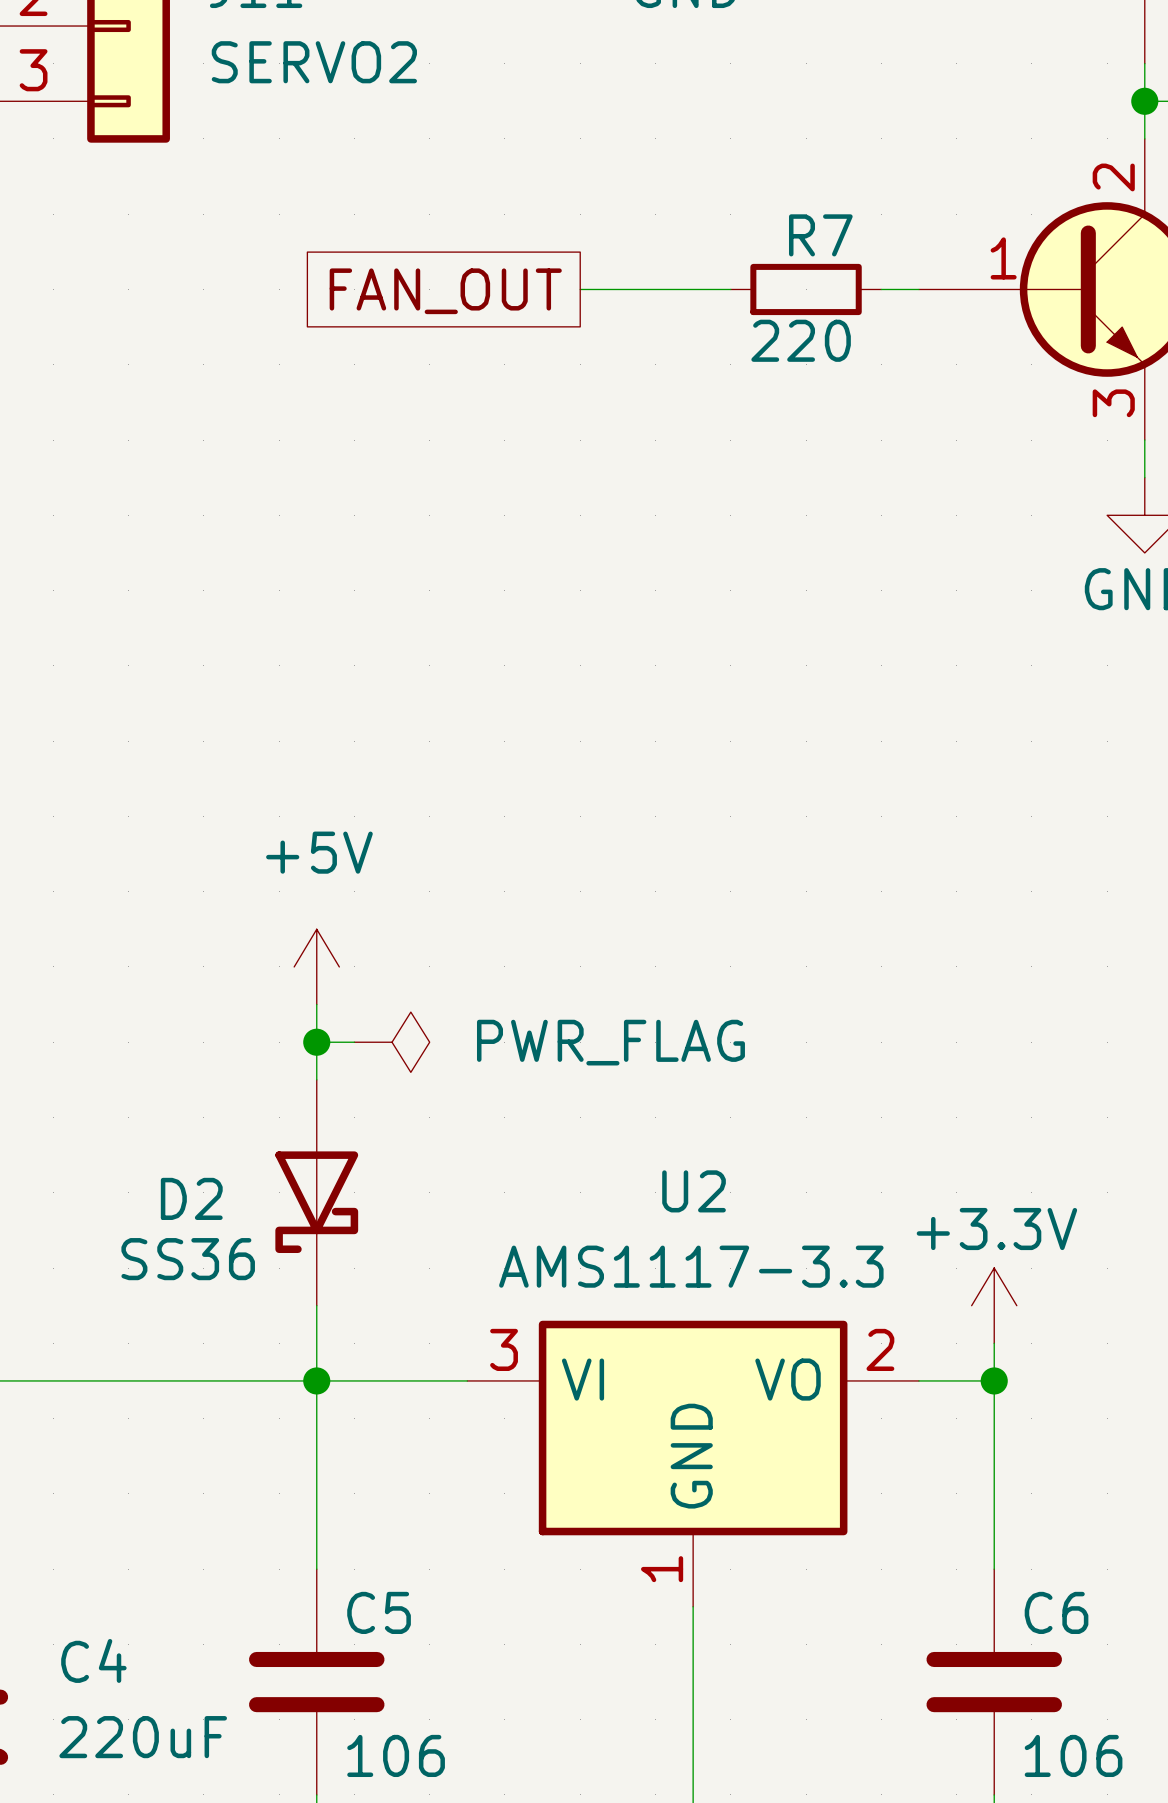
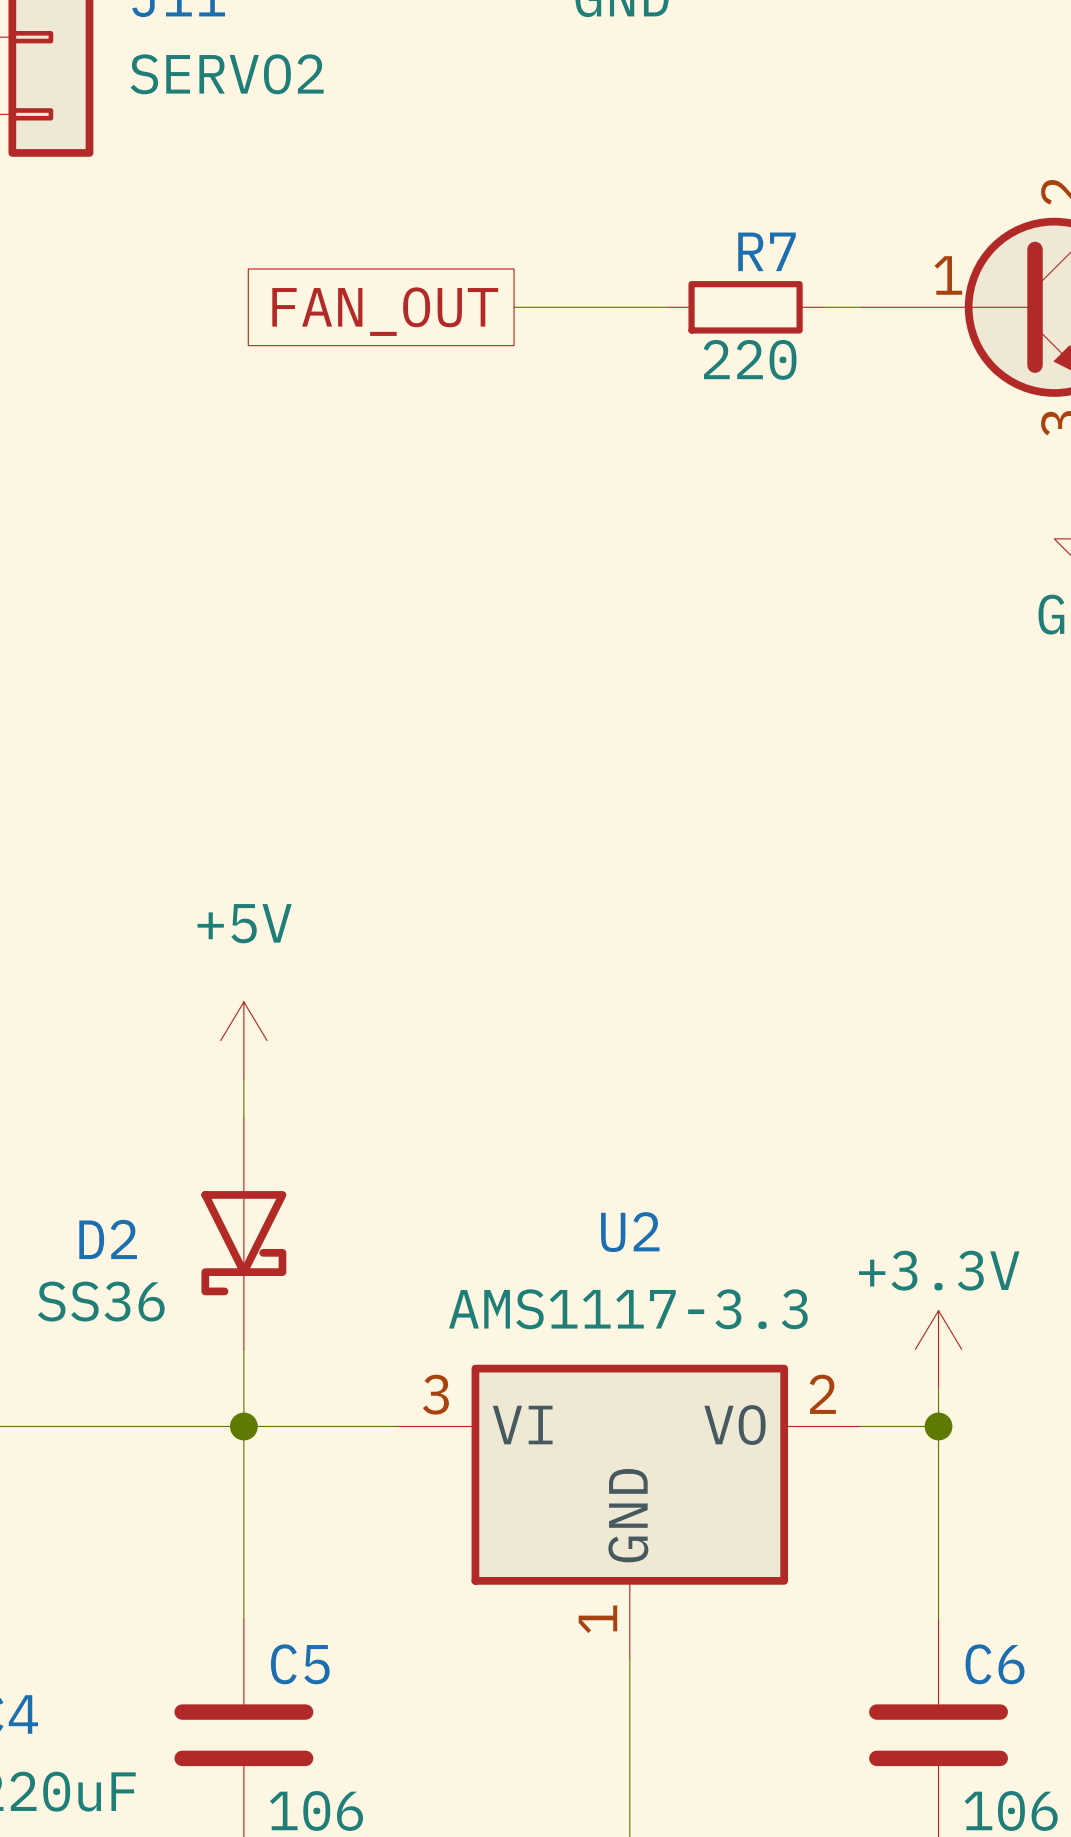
power symbol position: +5V (316, 966) -> +5V (243, 1040)
wire: (316, 1004) (316, 1042) (354, 1042) -> none
junction: (316, 1042) -> none
power symbol: PWR_FLAG (392, 1042) -> none

